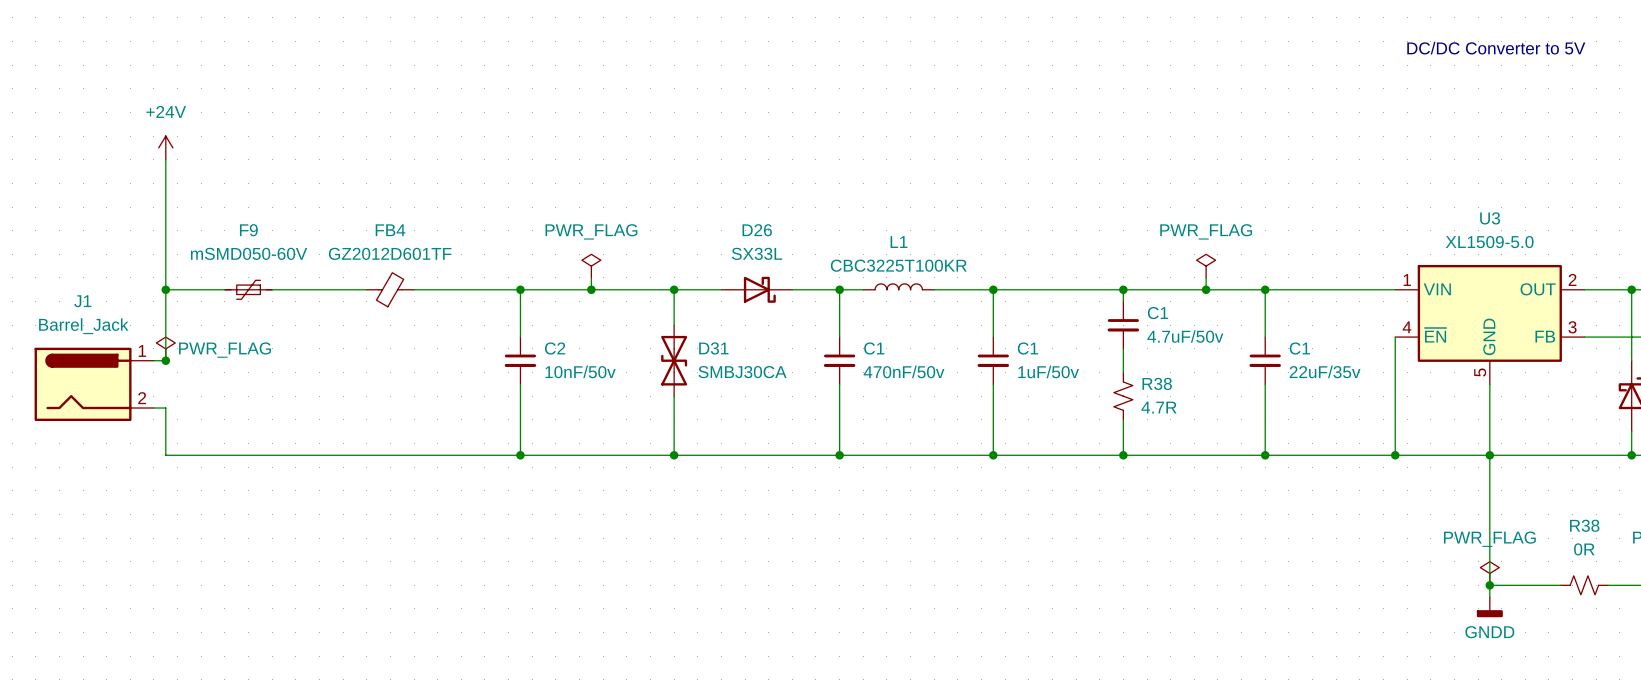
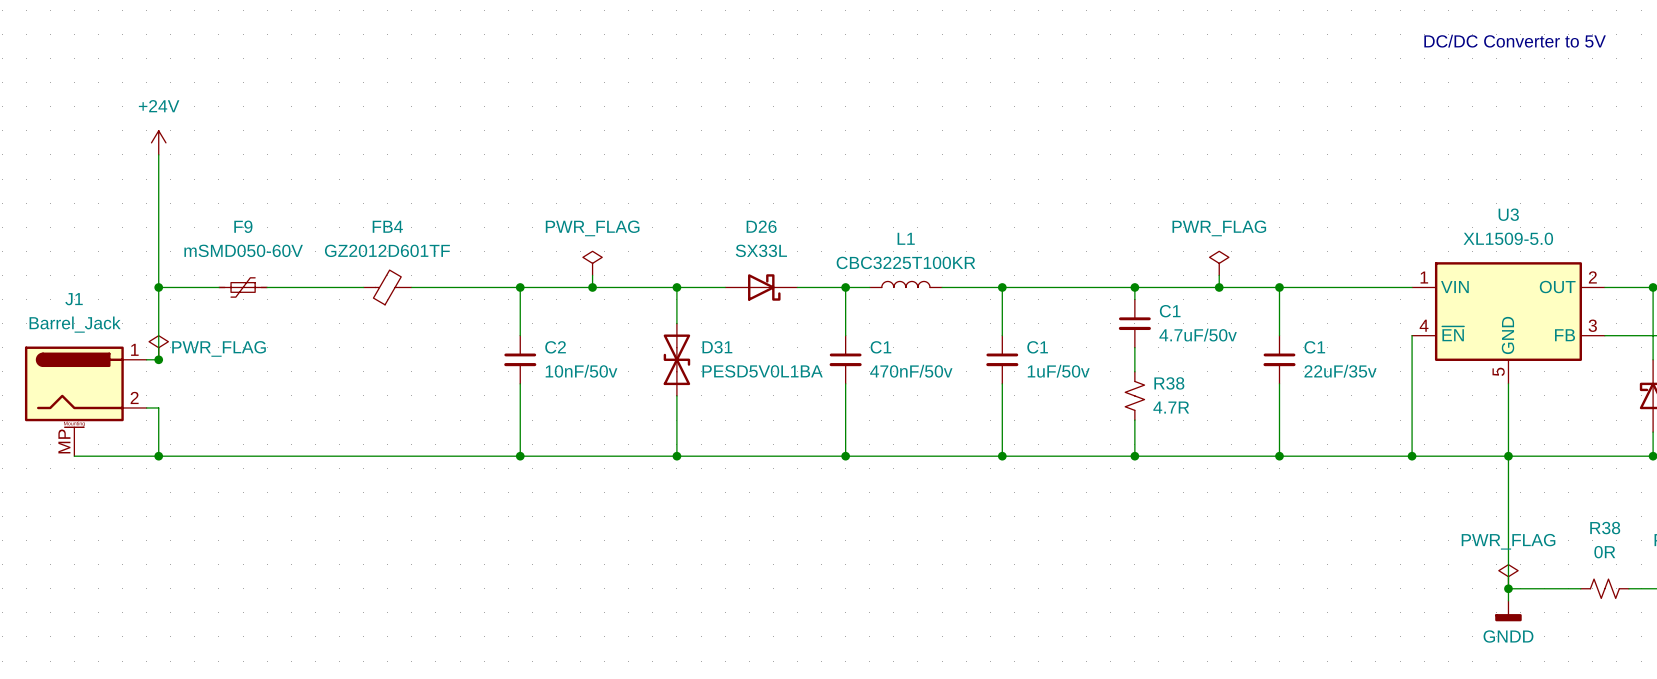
J1 symbol: [34, 347, 154, 422] -> [24, 346, 147, 457]
D31 value: SMBJ30CA (742, 372) -> PESD5V0L1BA (762, 371)
wire: none -> (74, 456) (158, 456)
junction: none -> (158, 456)

